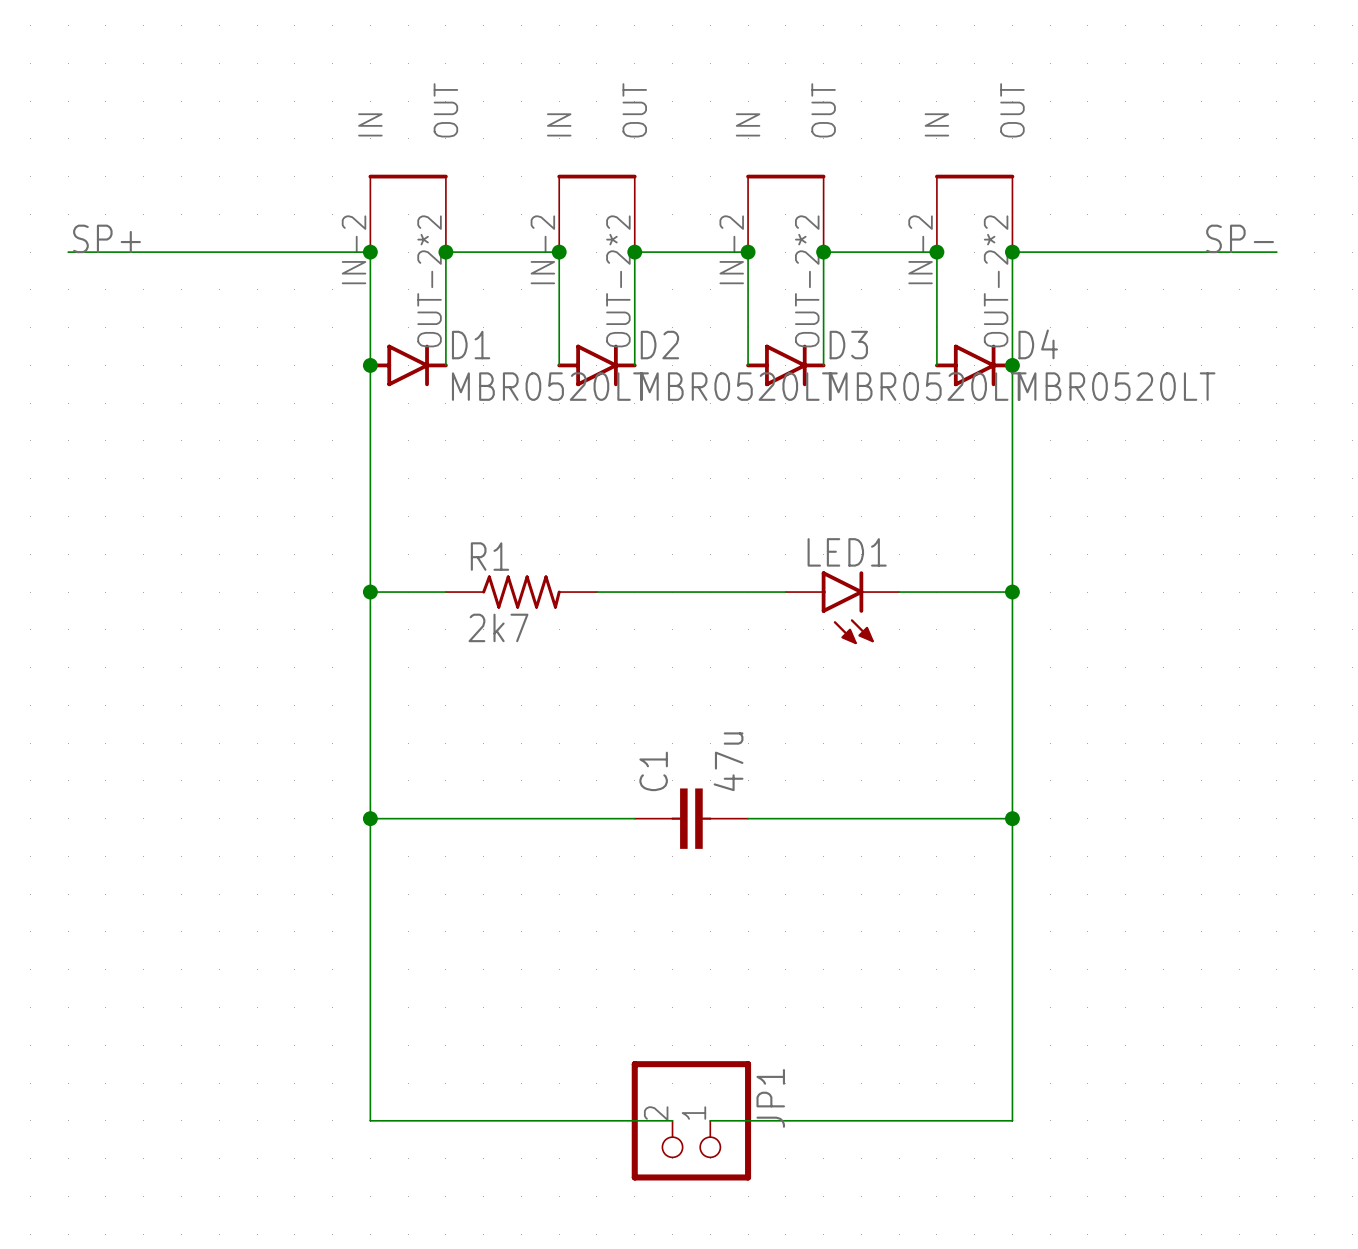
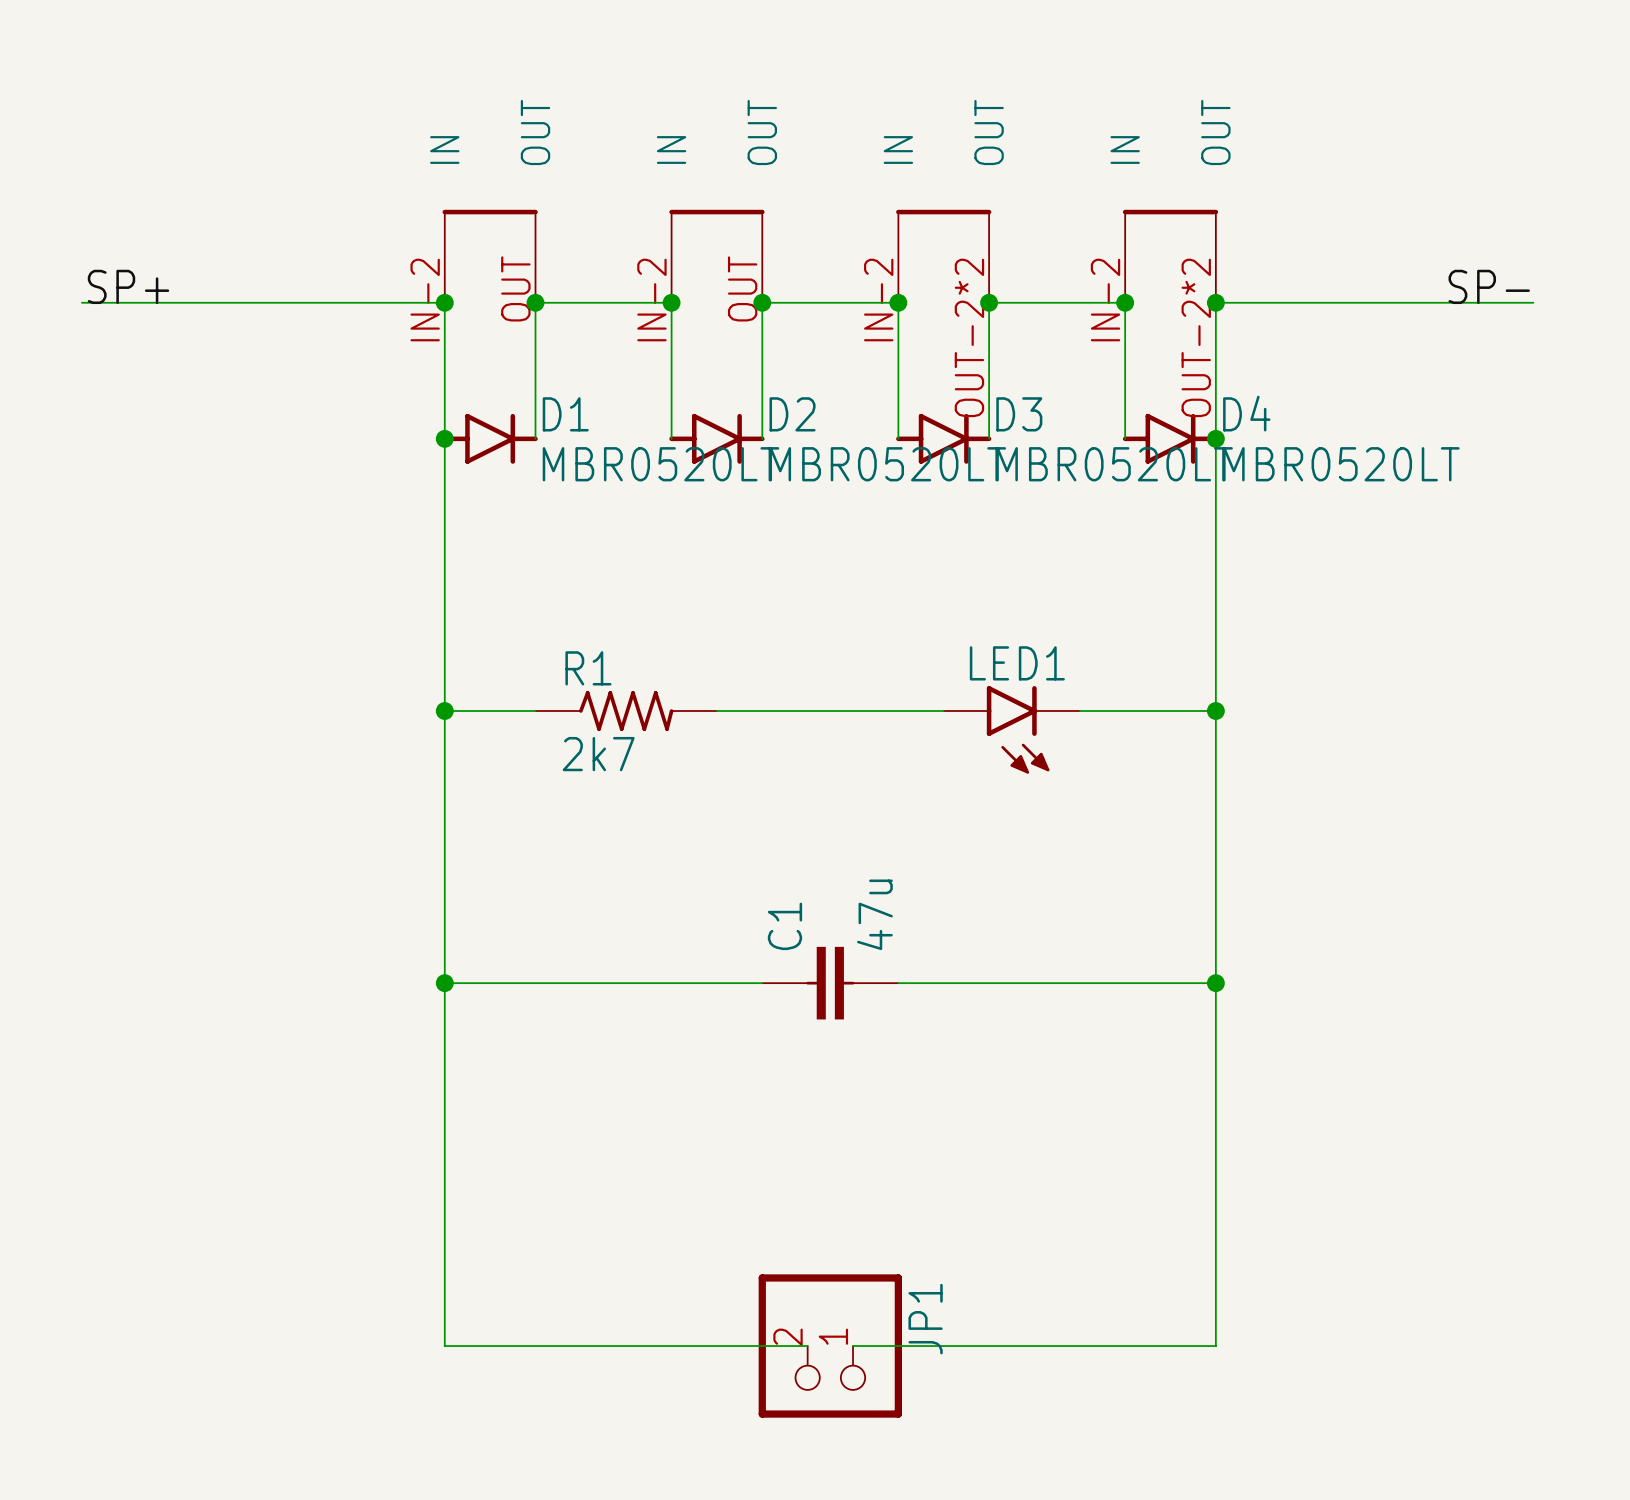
part pin number: OUT-2*2 (429, 281) -> OUT (515, 288)
part pin number: OUT-2*2 (618, 281) -> OUT (742, 288)

